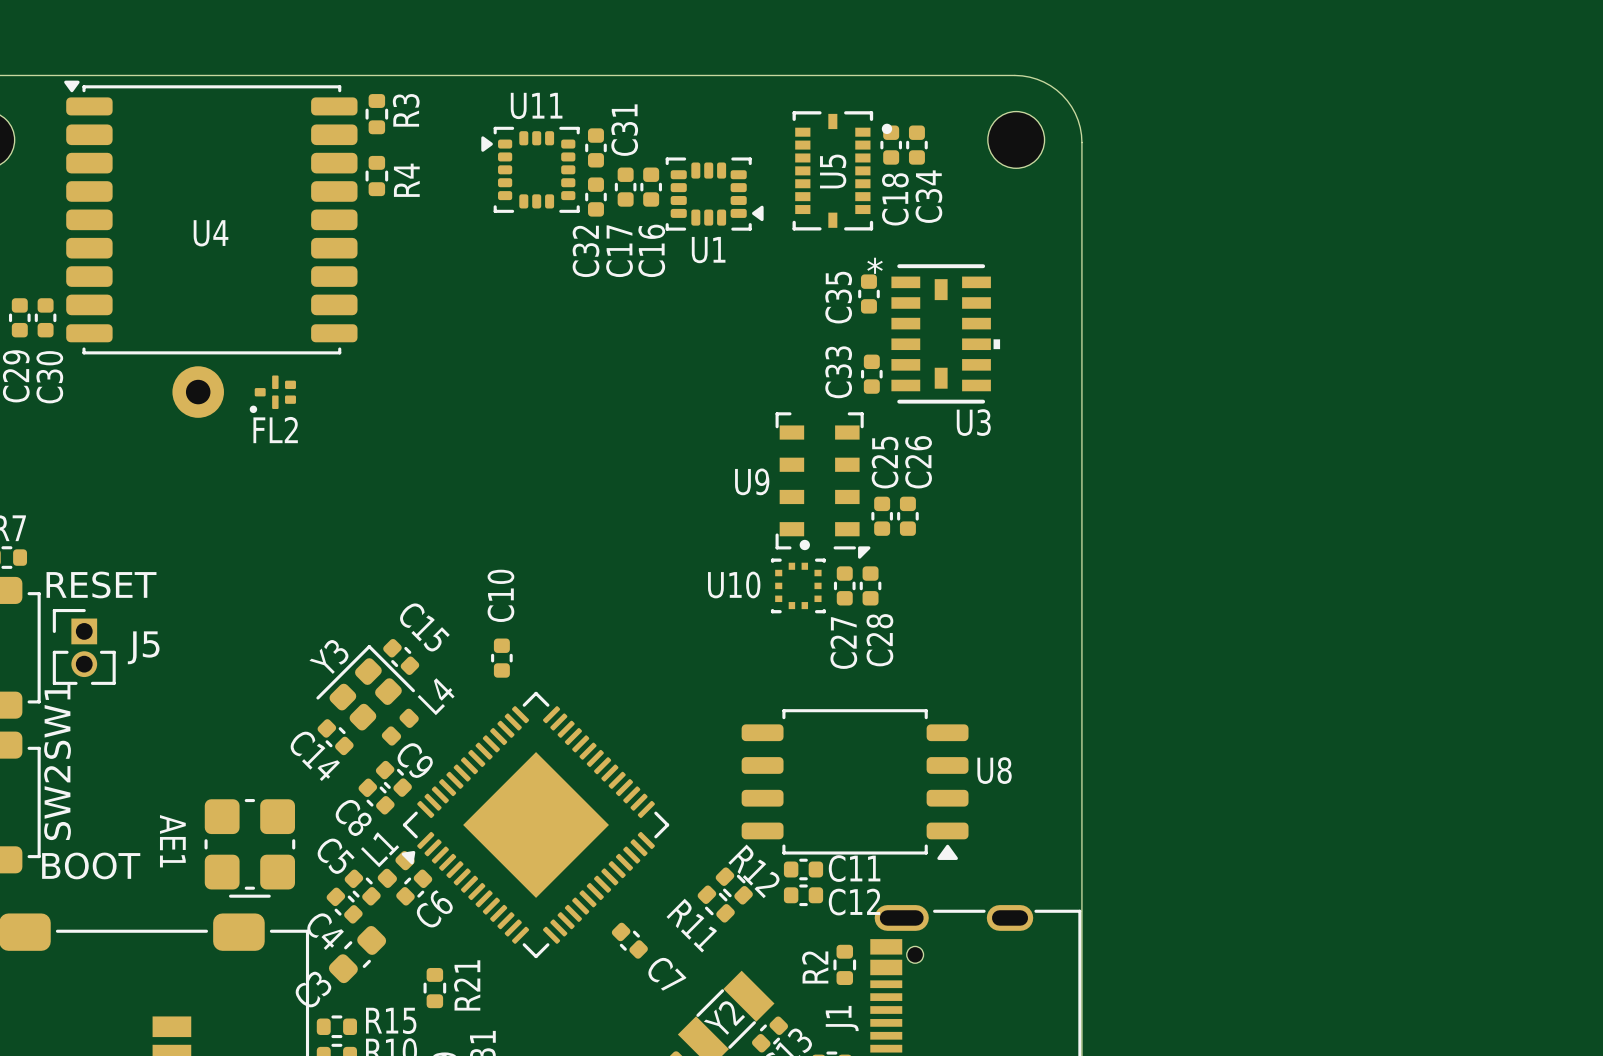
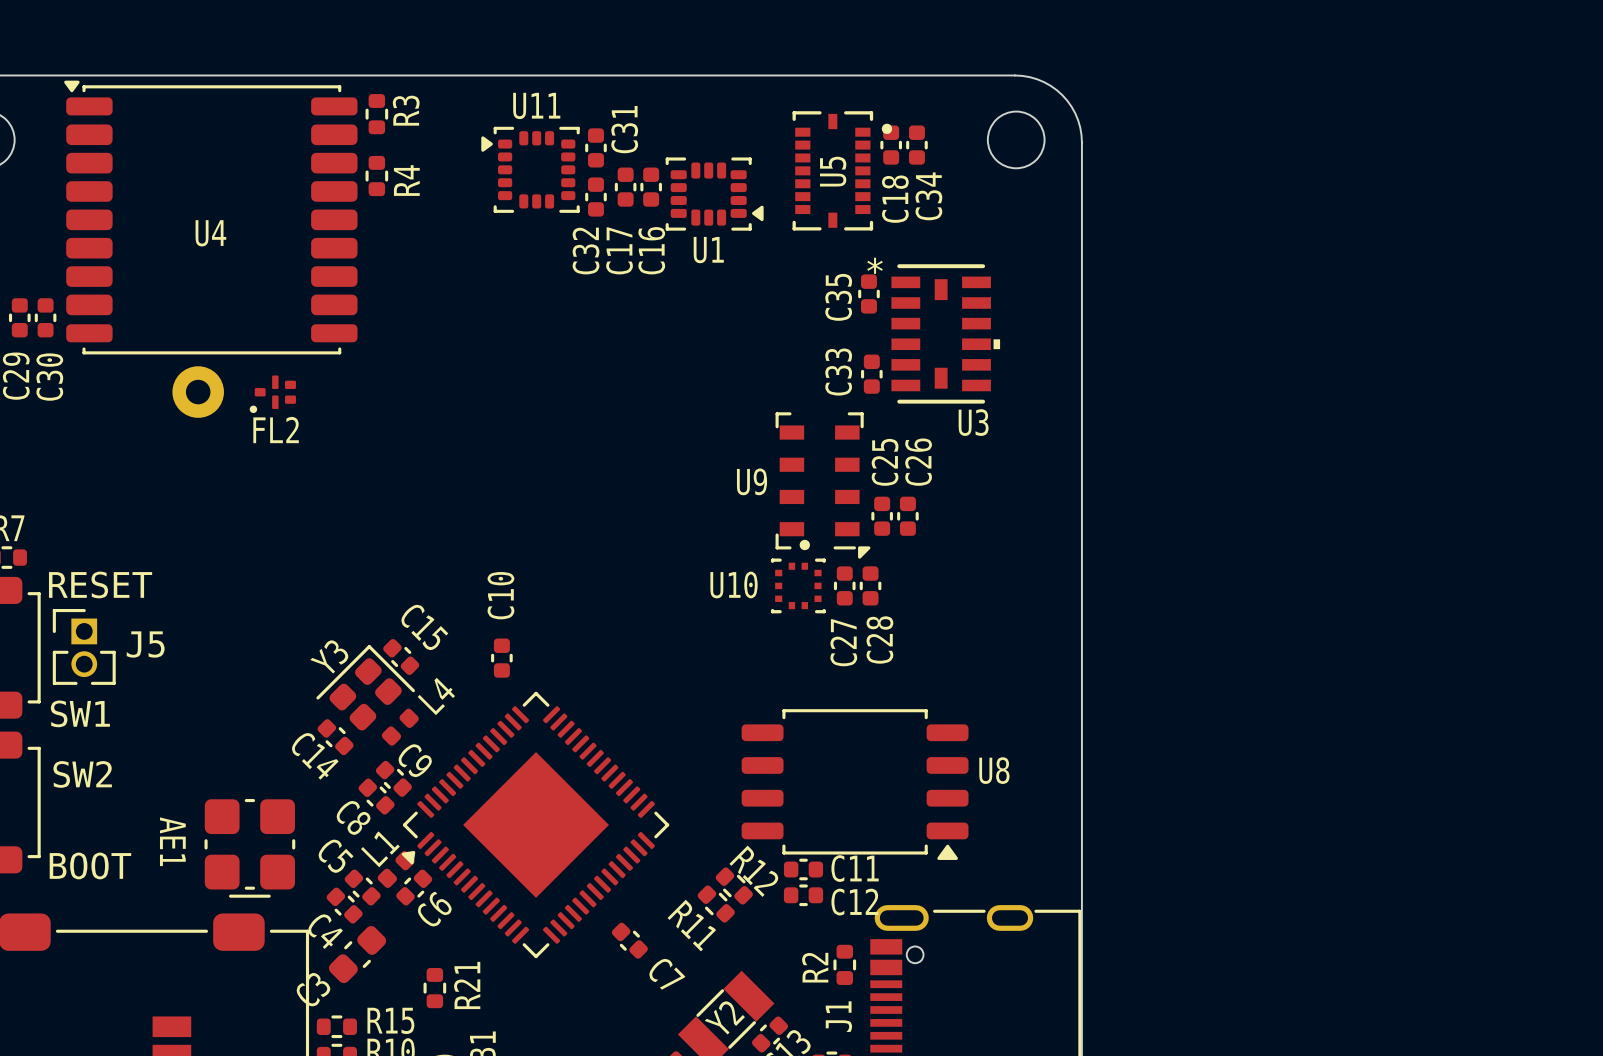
SW1 name rotation: 0° (57, 721) -> 90° clockwise (80, 713)
SW2 name rotation: 0° (57, 803) -> 90° clockwise (82, 774)

